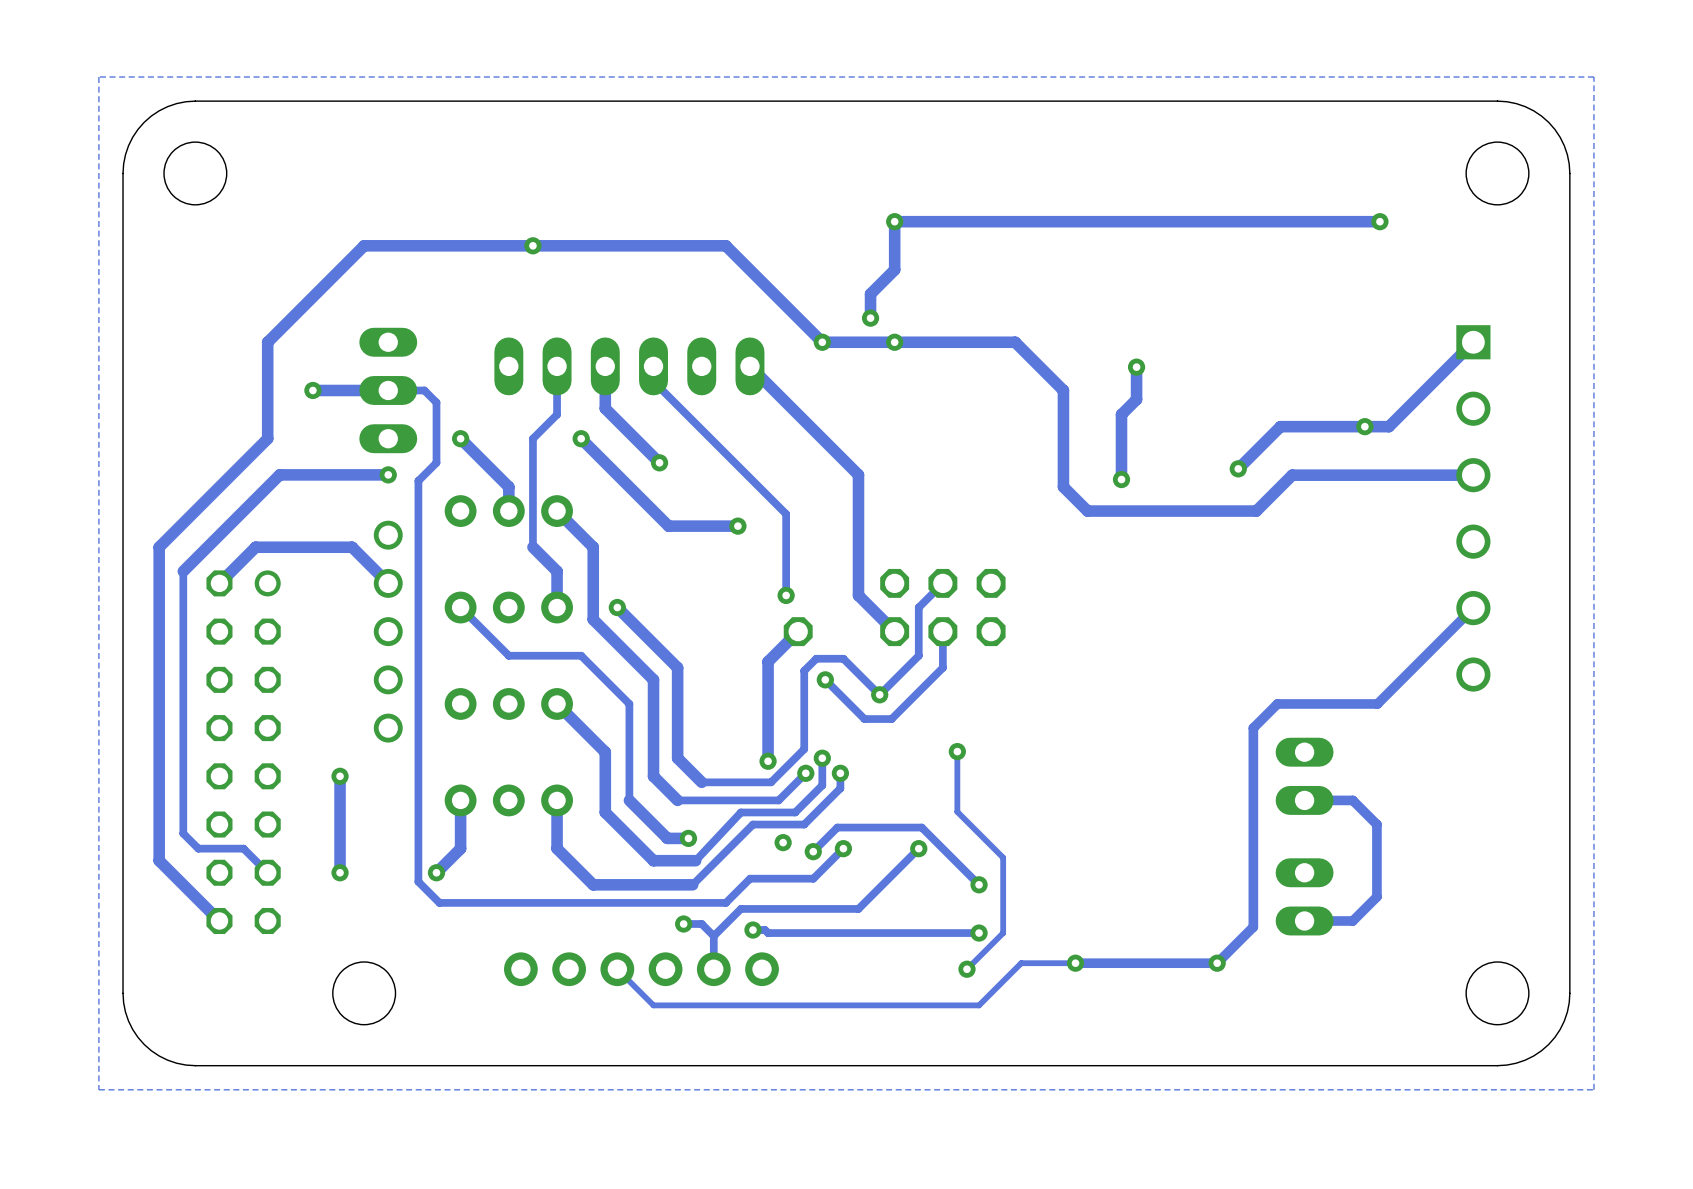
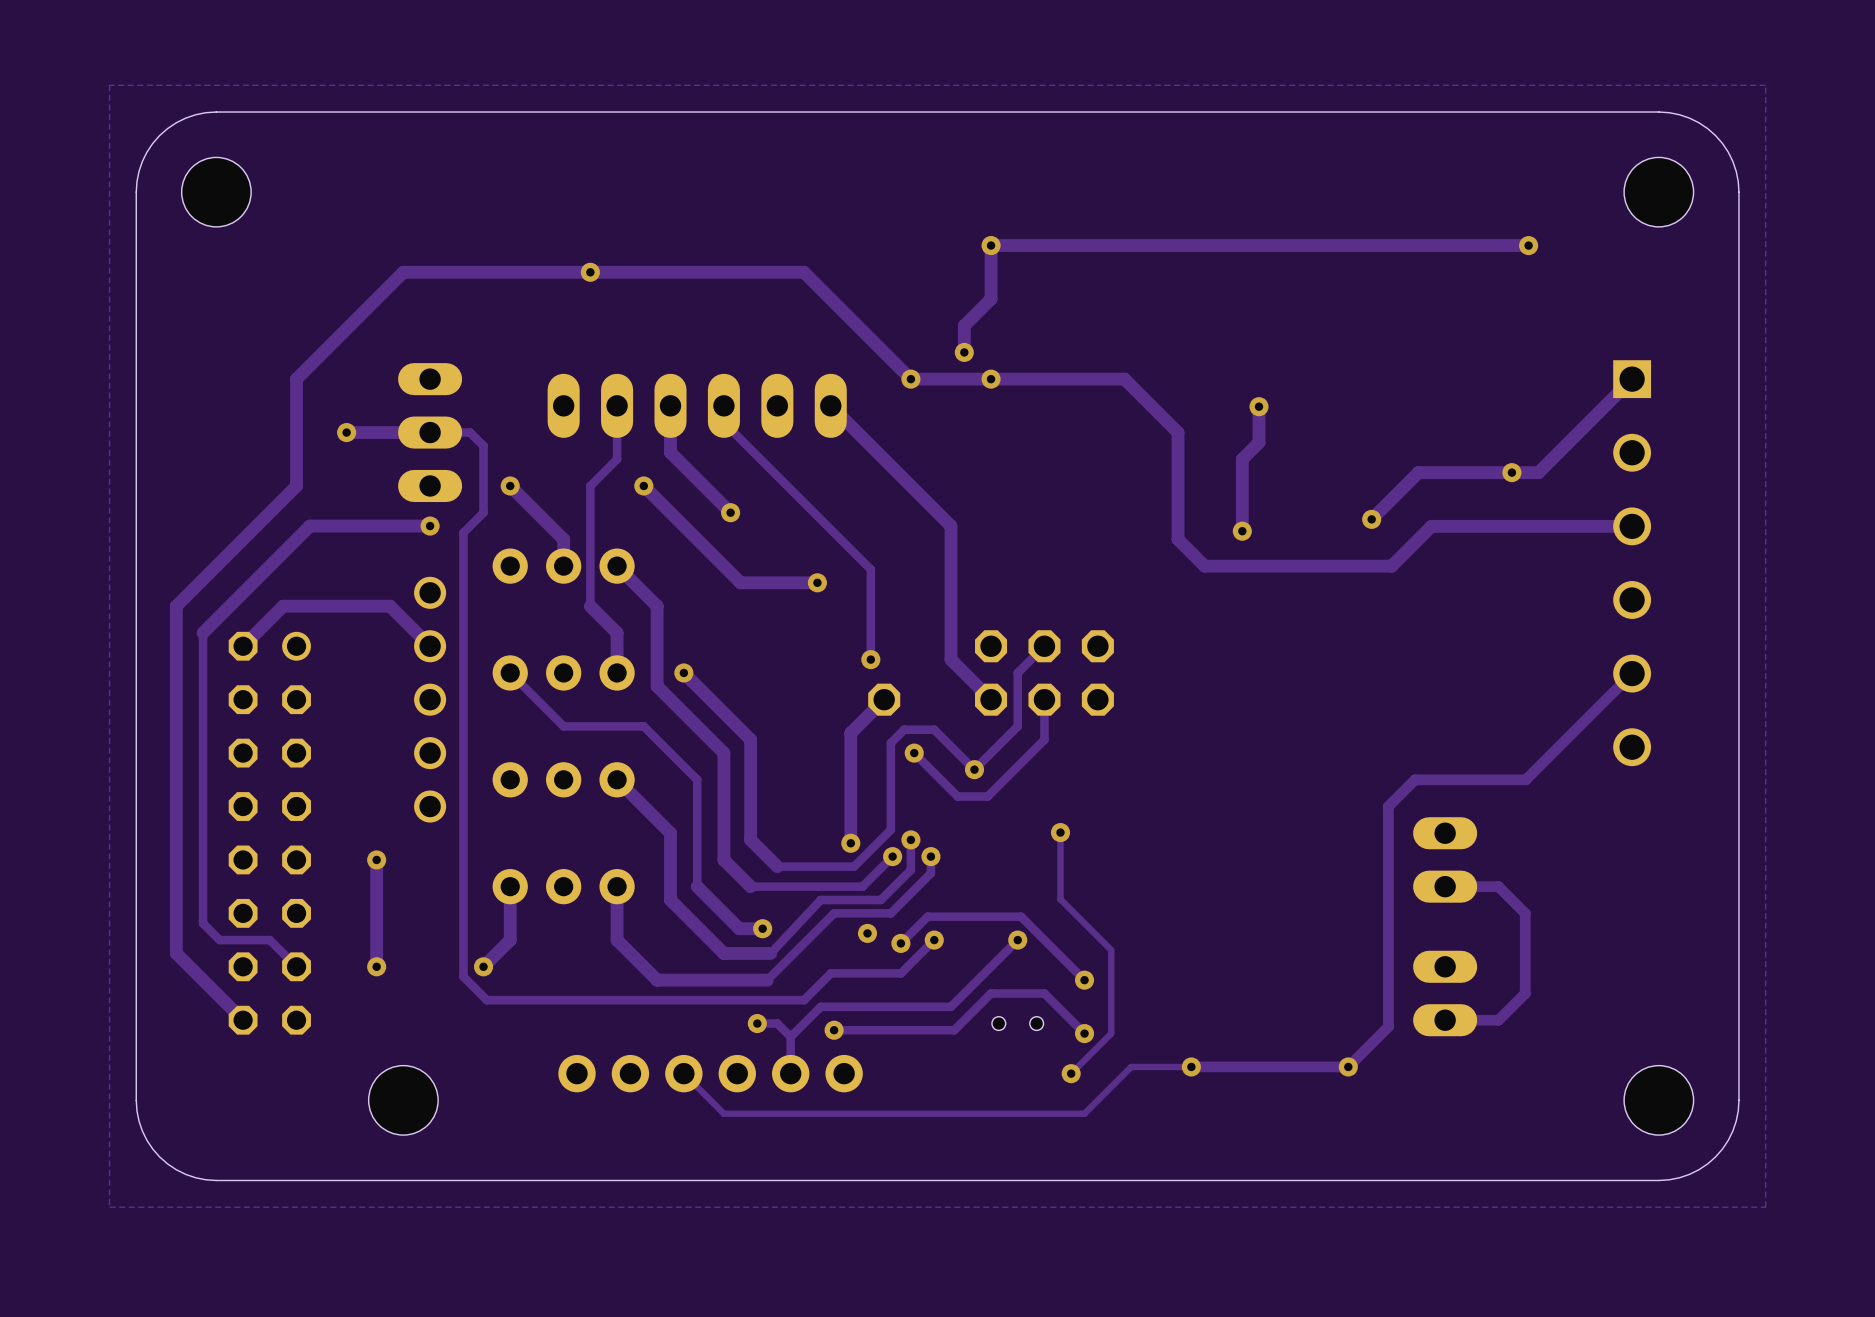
part: none -> (1017, 1023)
track: (765, 930) (768, 933) (979, 933) -> (847, 1030) (954, 1030) (991, 993) (1044, 993) (1084, 1033)

